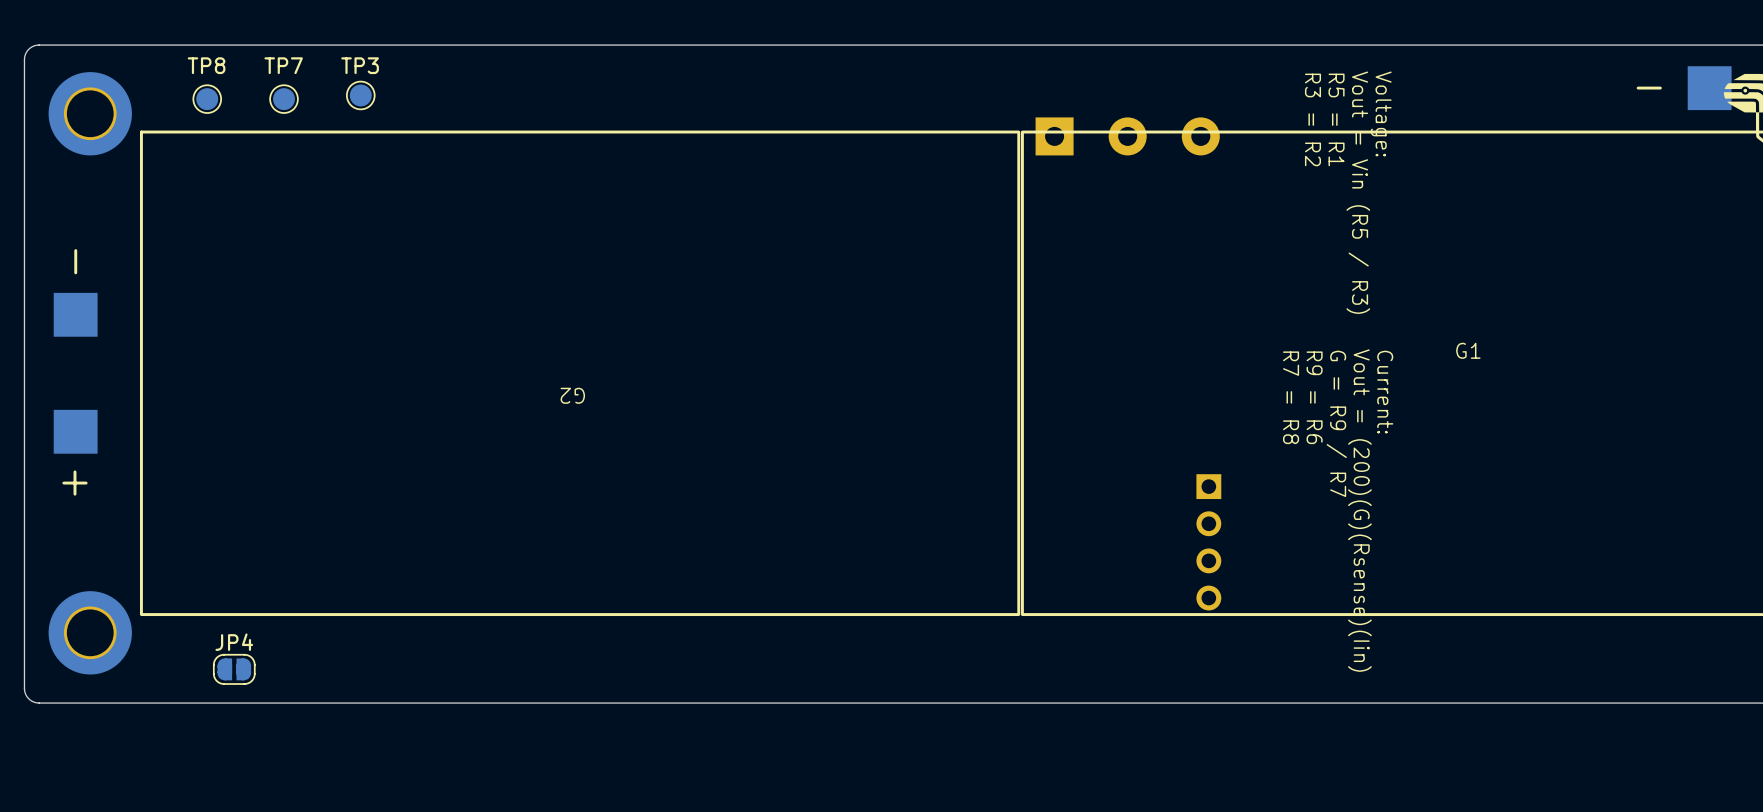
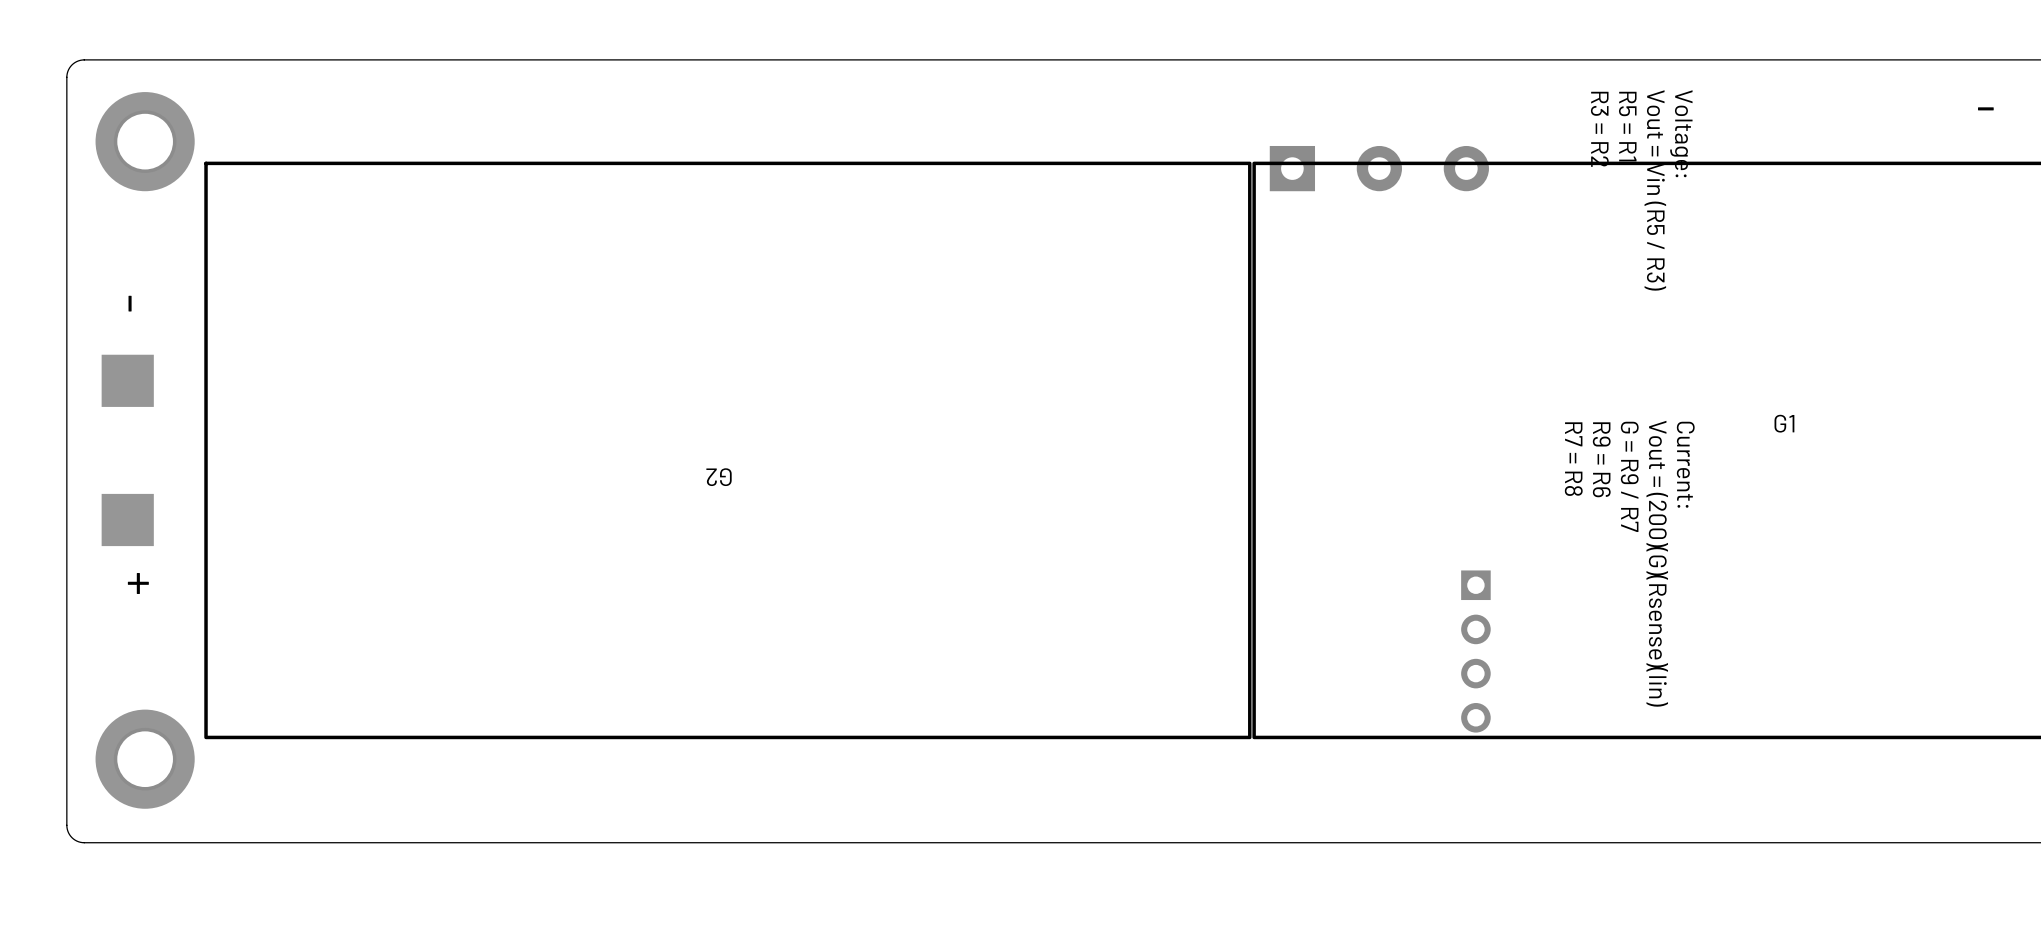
TP3: (360, 95) -> none
TP8: (207, 99) -> none
TP7: (284, 99) -> none
JP4: (234, 669) -> none

